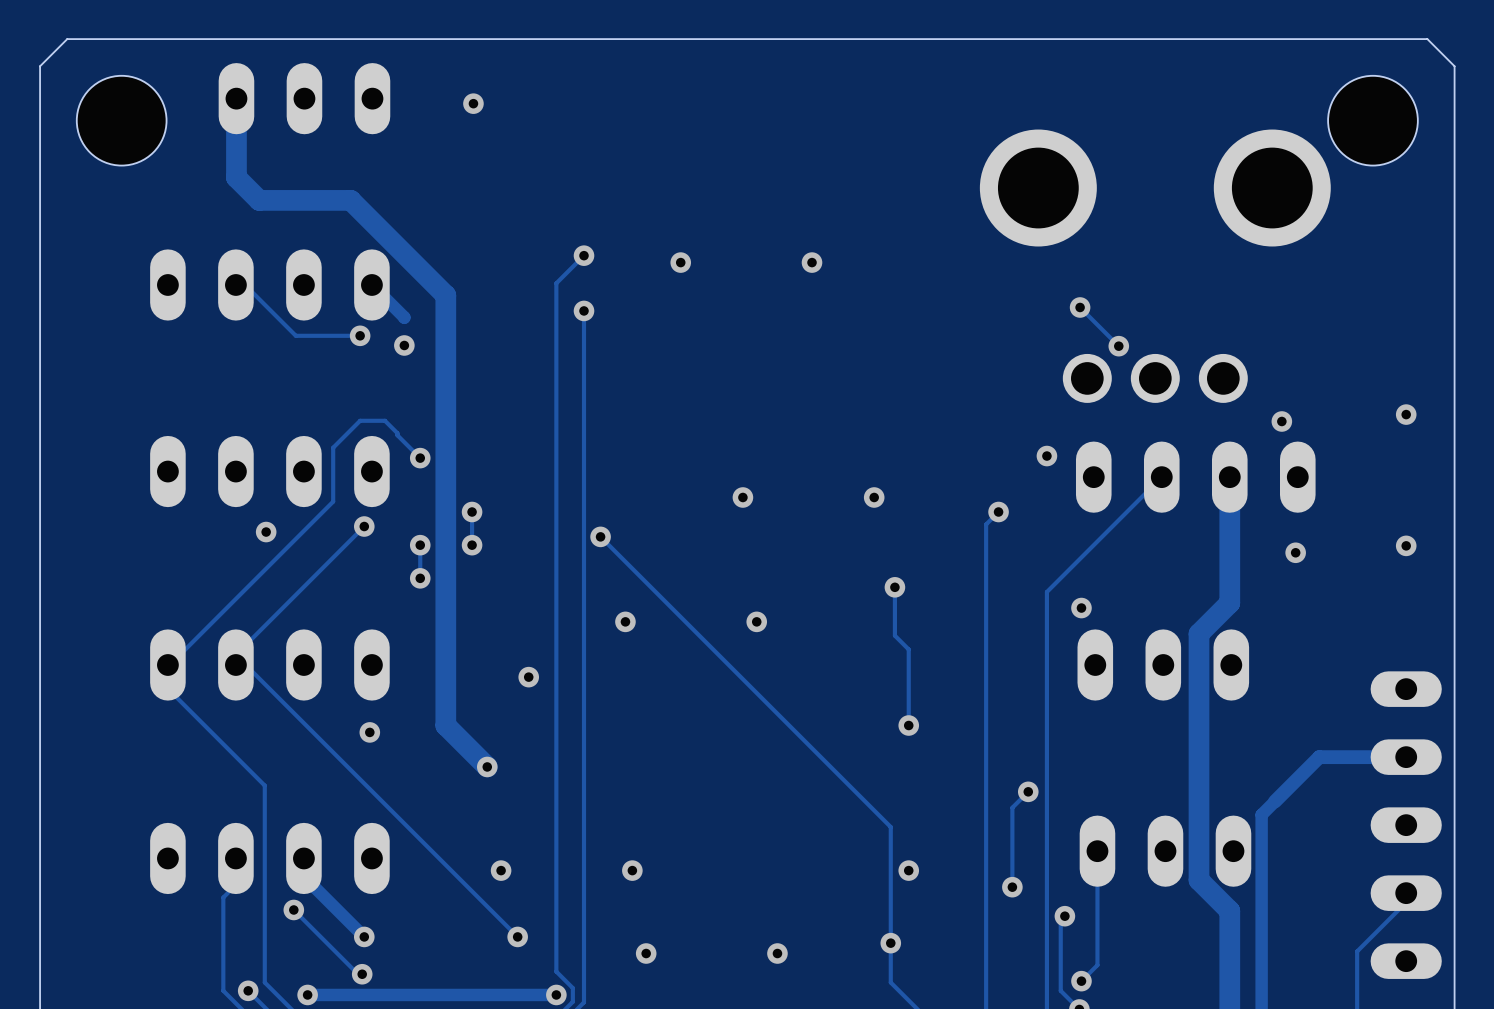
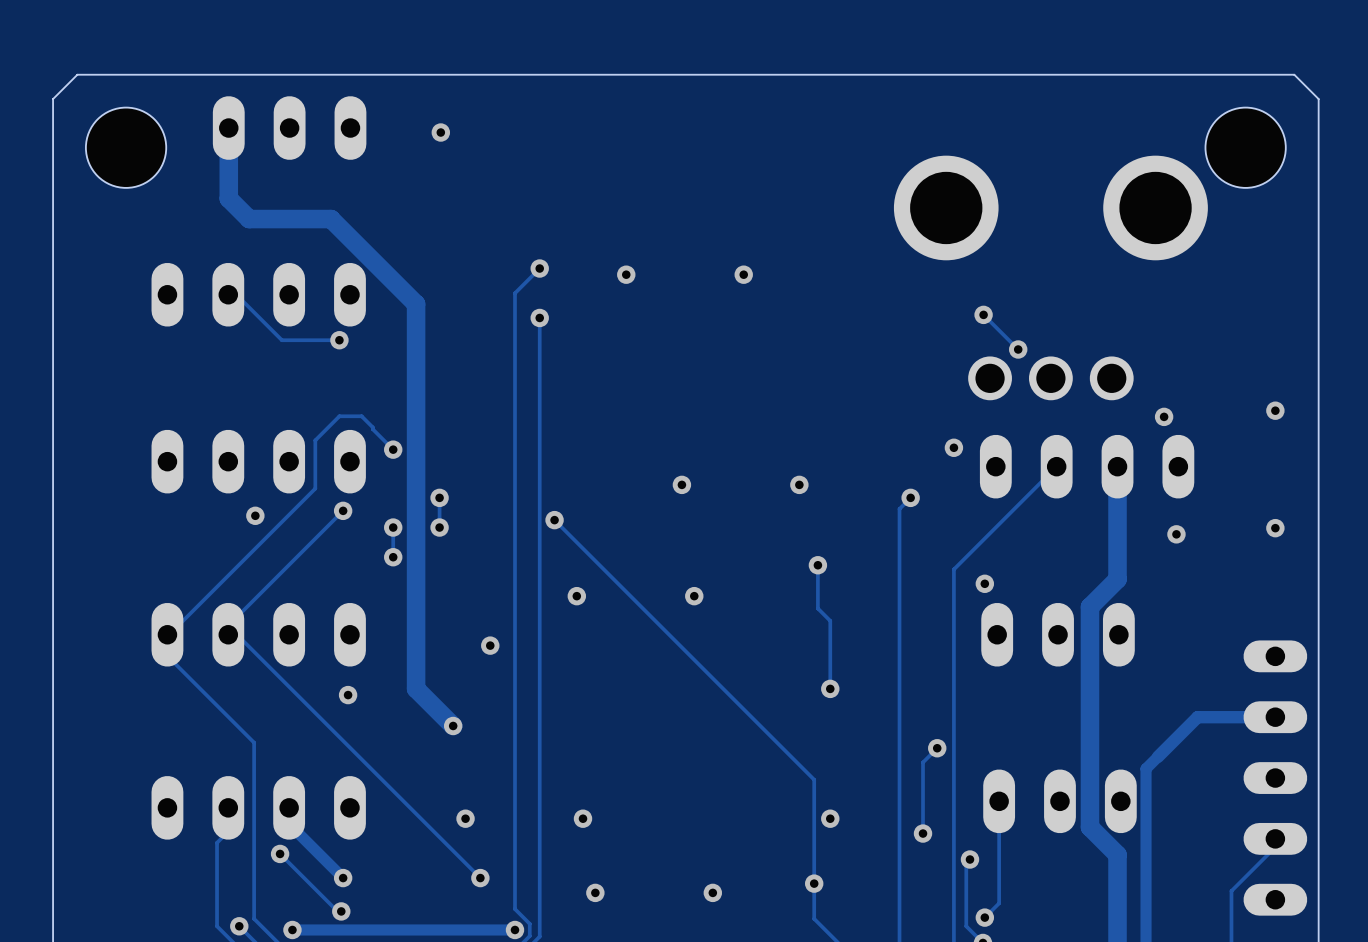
track: (371, 284) (404, 317) -> none
via: (404, 345) -> none

